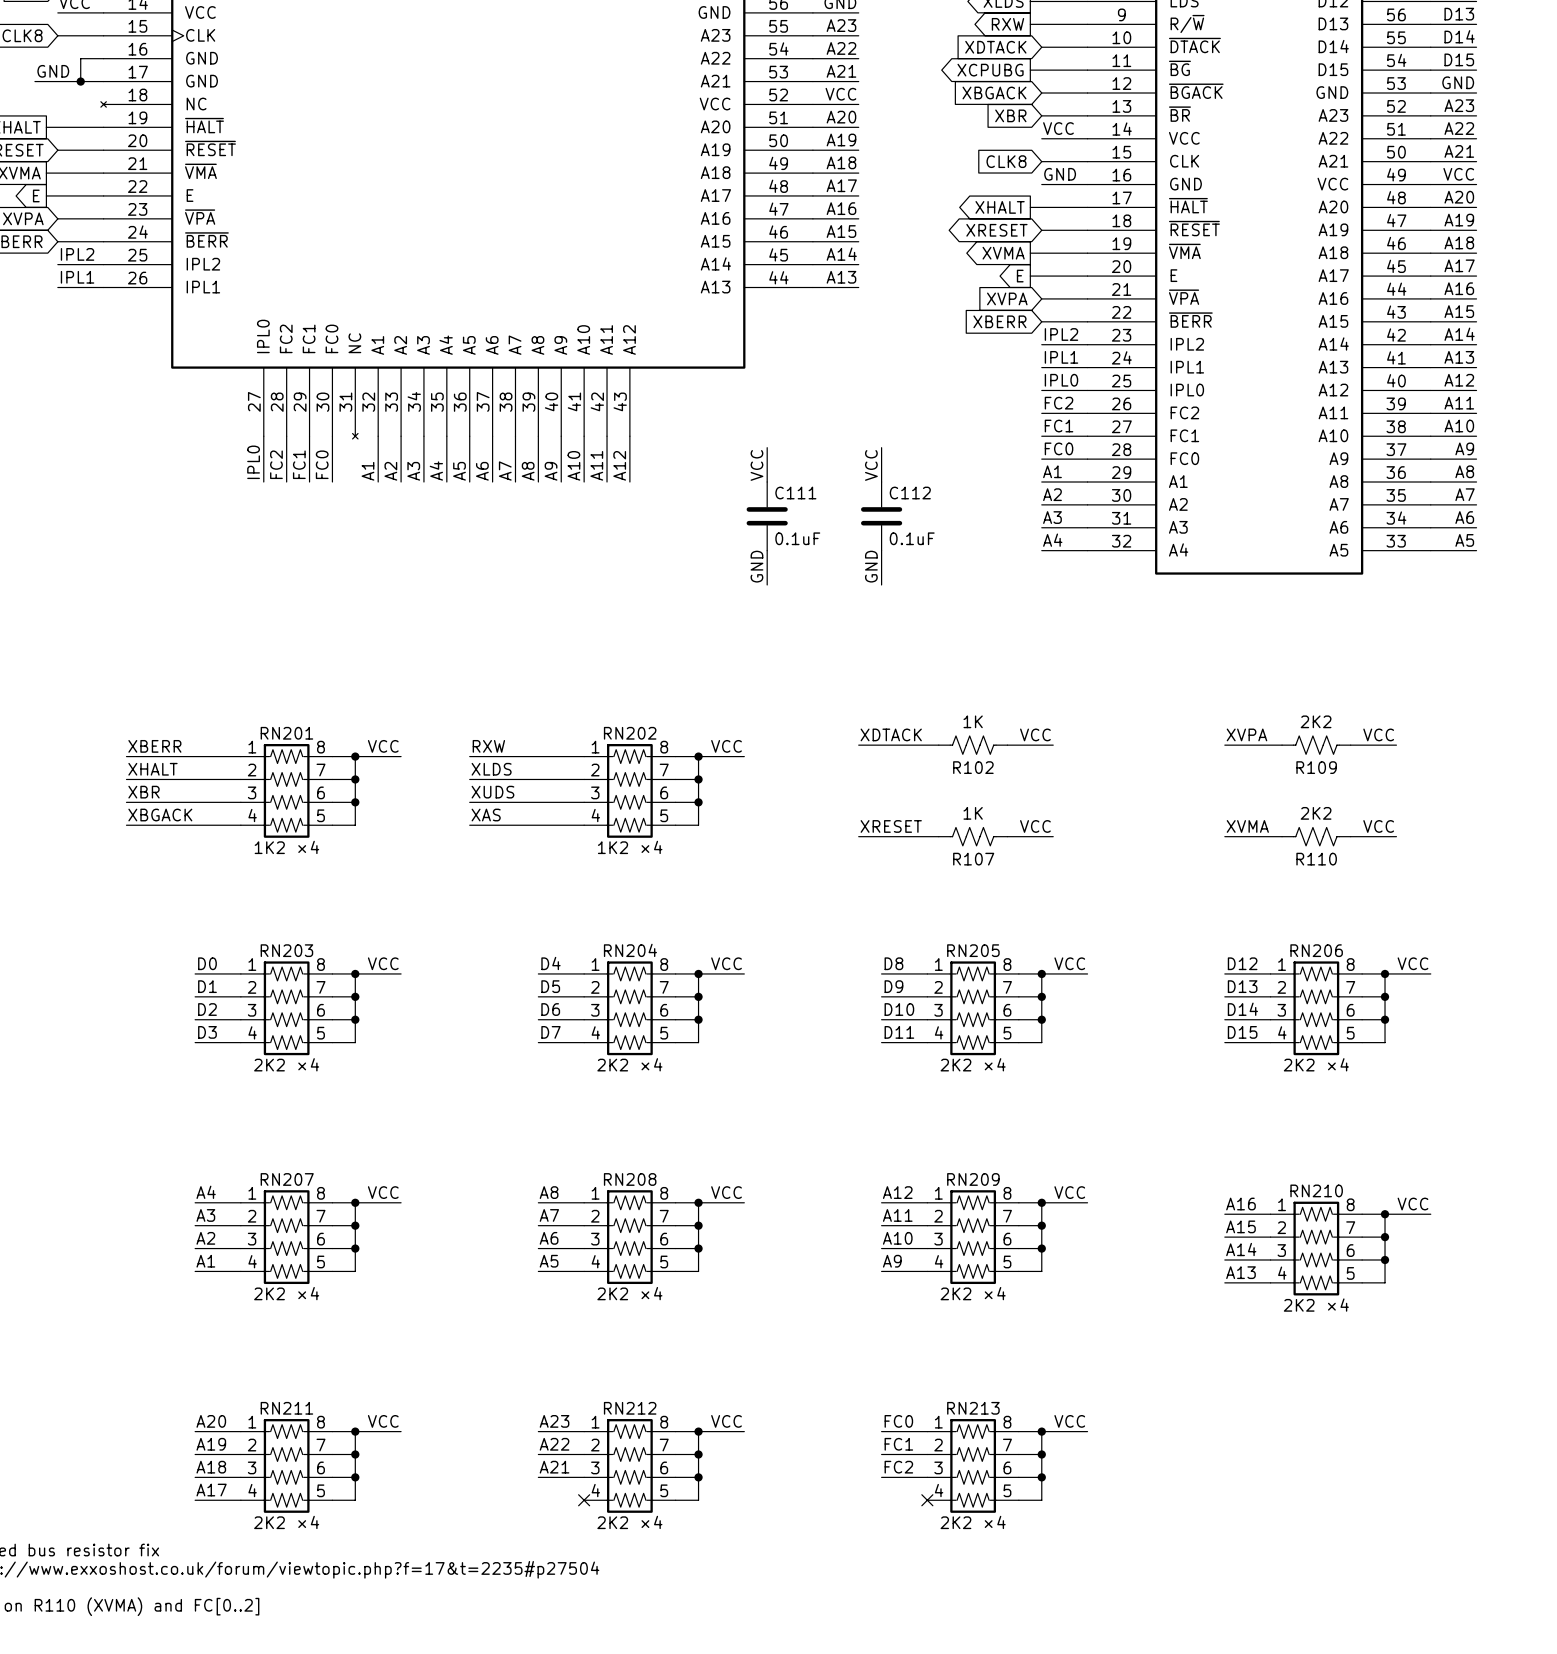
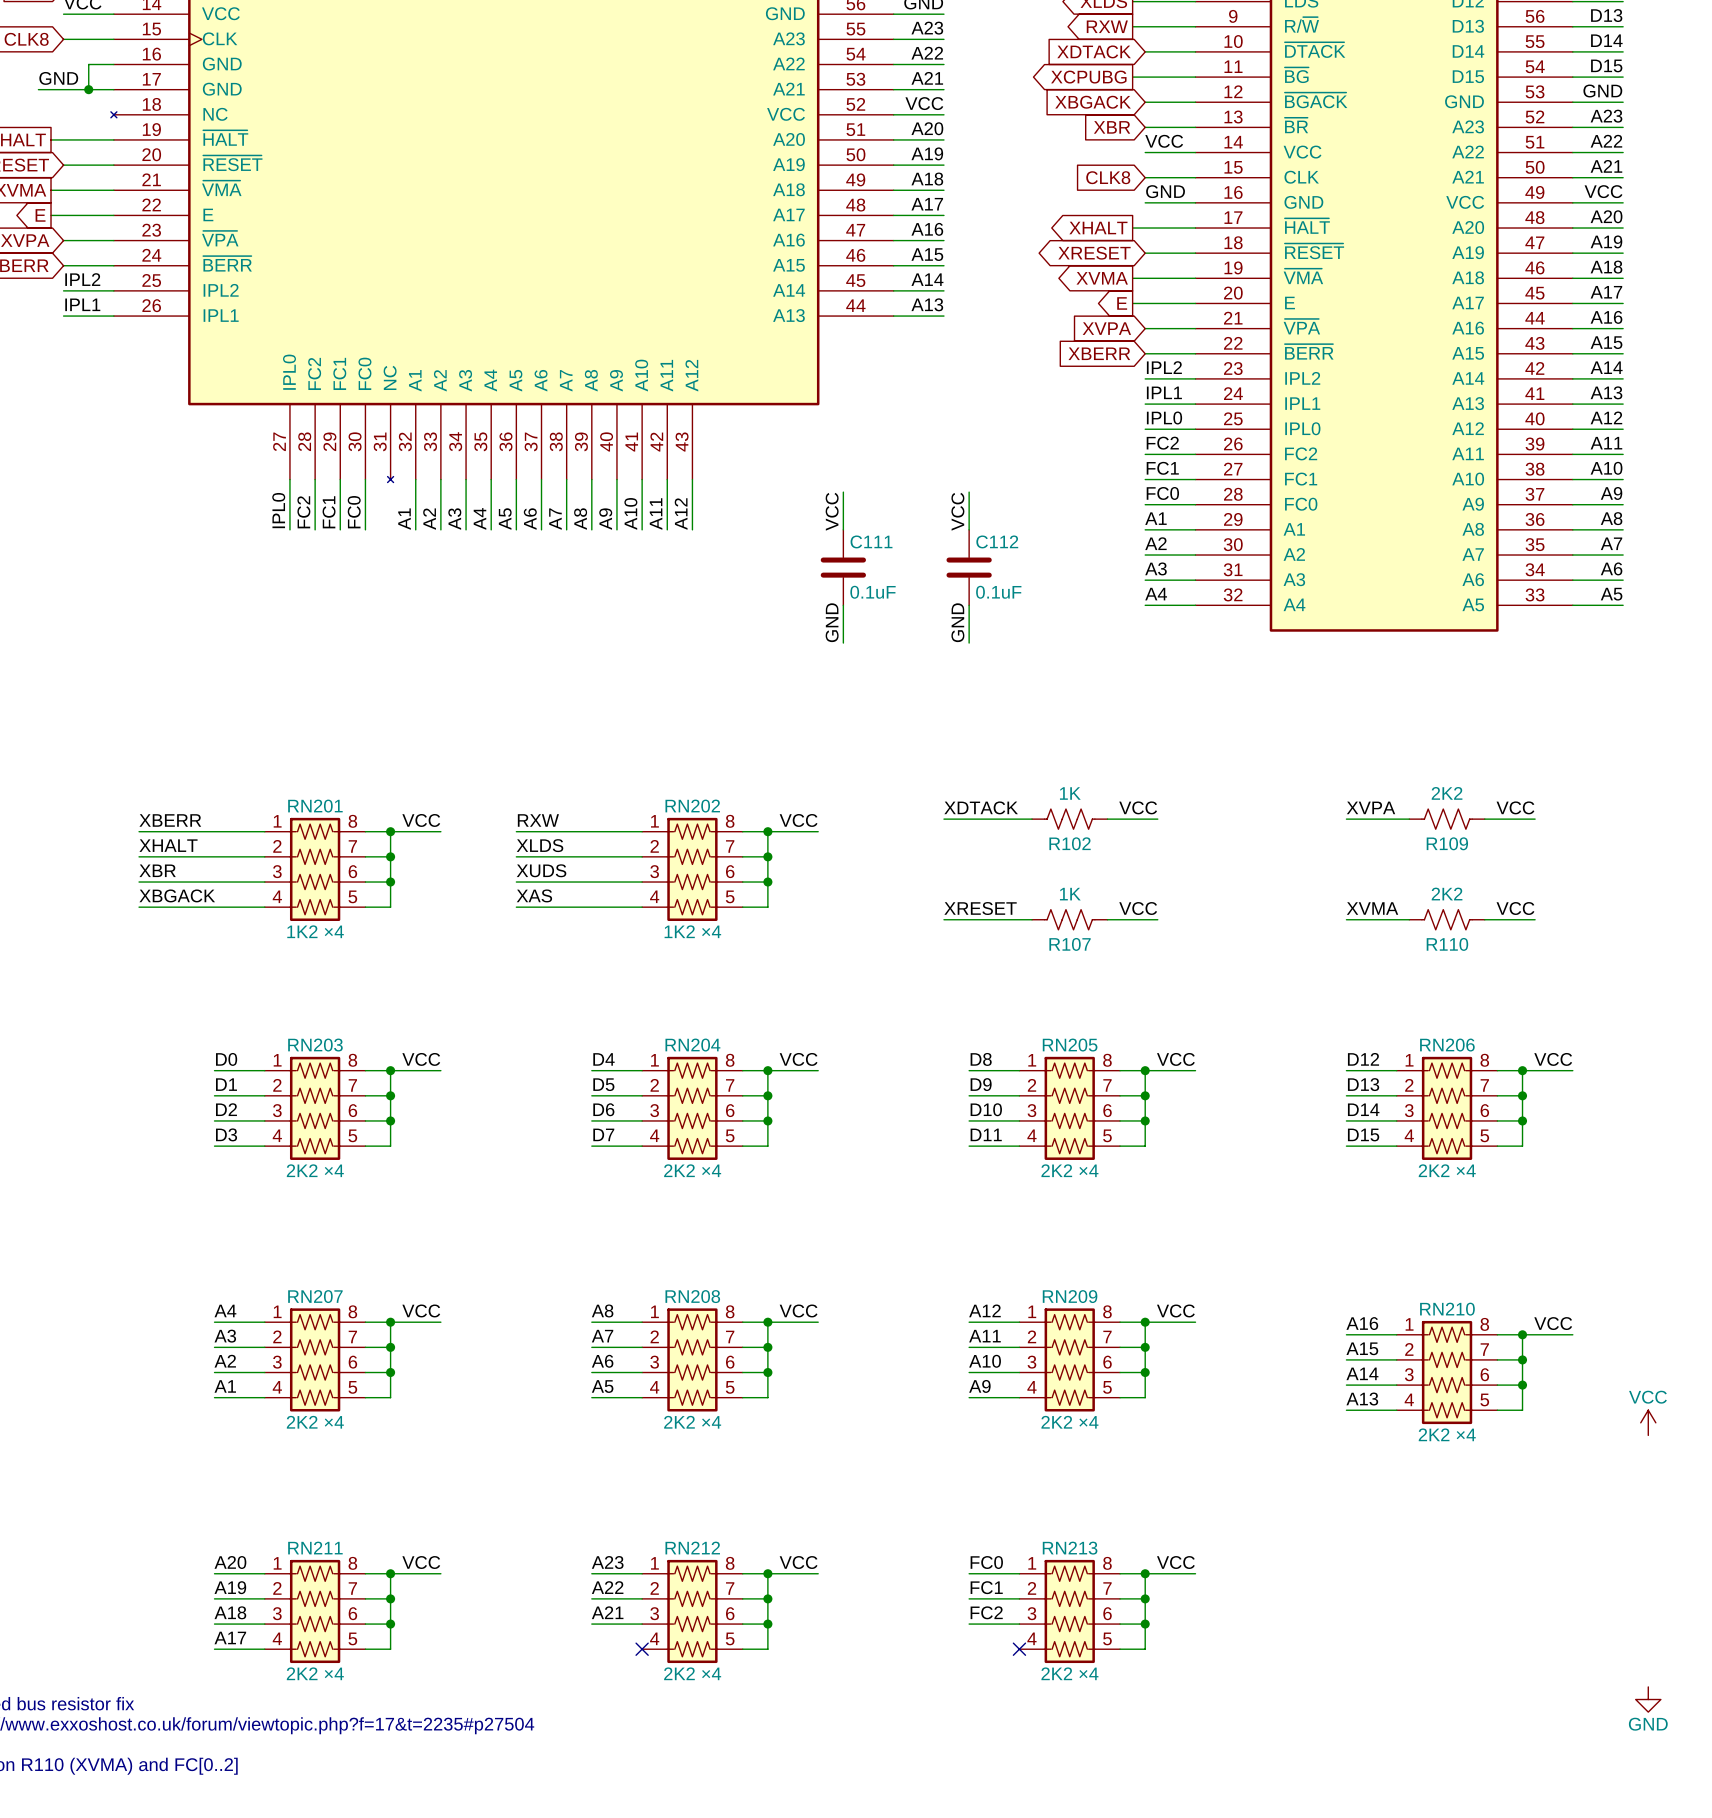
power symbol: none -> VCC (1648, 1422)
power symbol: none -> GND (1648, 1699)

